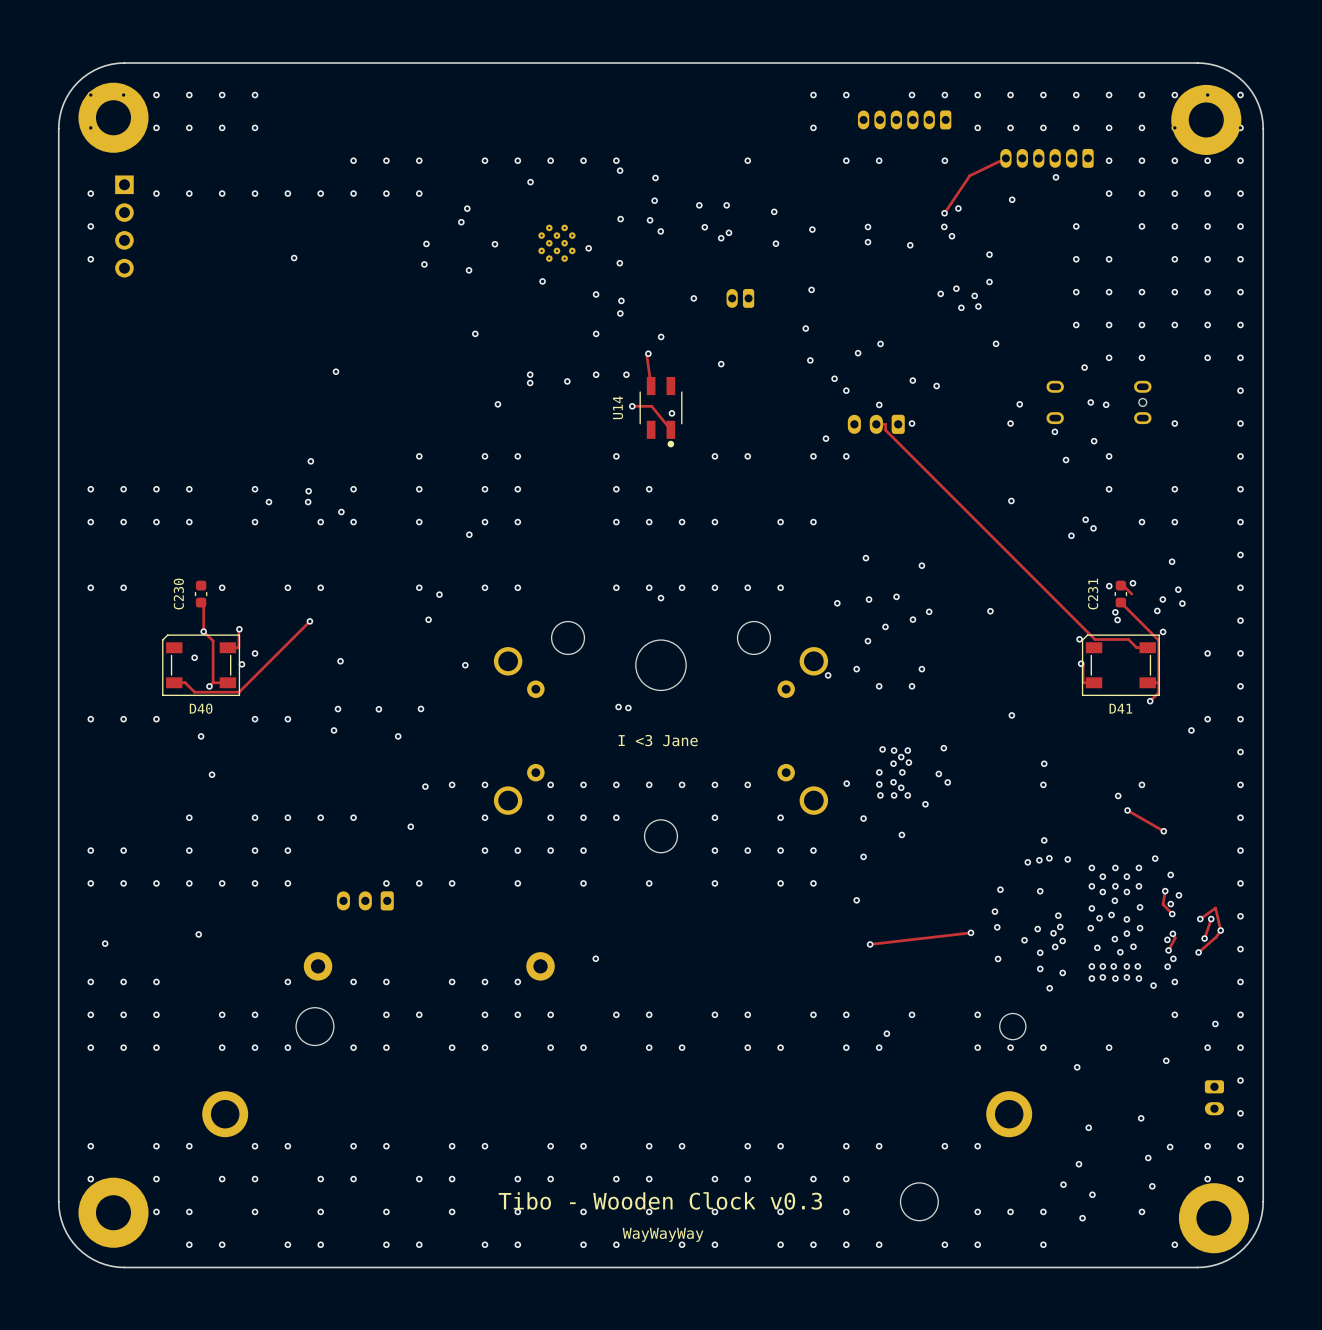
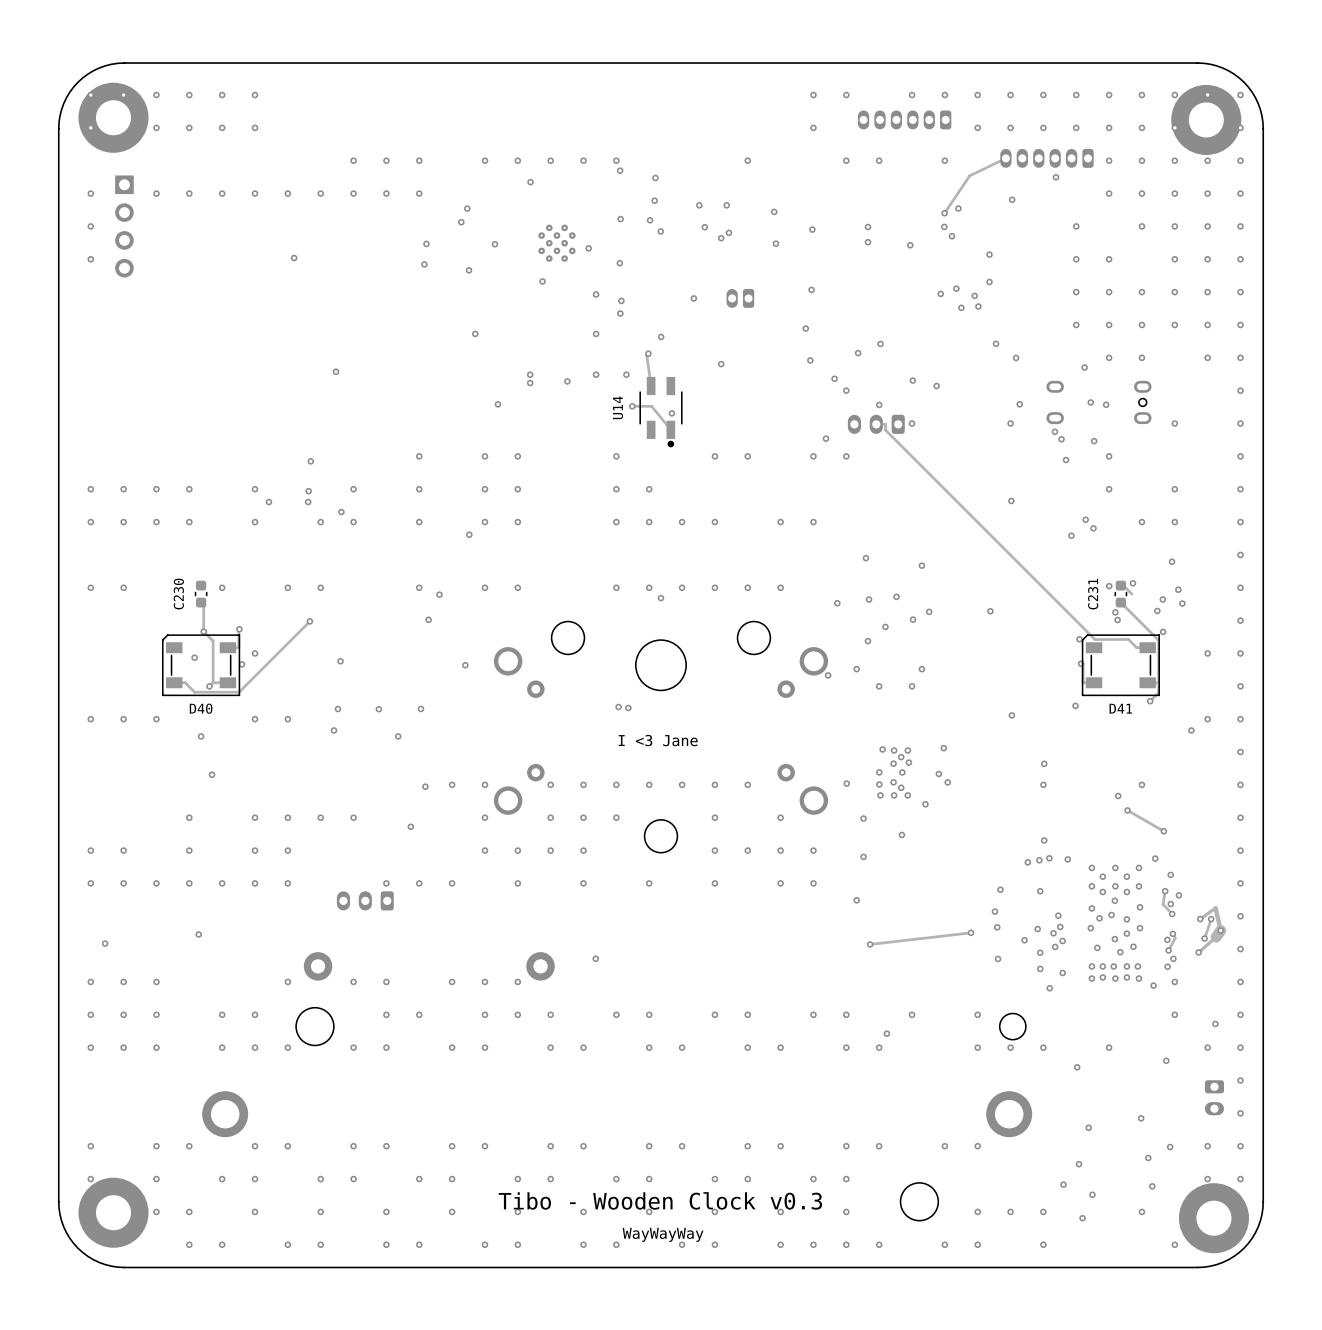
via: none -> (1016, 357)
via: none -> (1061, 439)
via: none -> (1075, 705)
track width: thin (1200, 919) (1215, 908) (1220, 930) (1198, 952) -> thick (1200, 919) (1215, 908) (1220, 930) (1198, 952)

